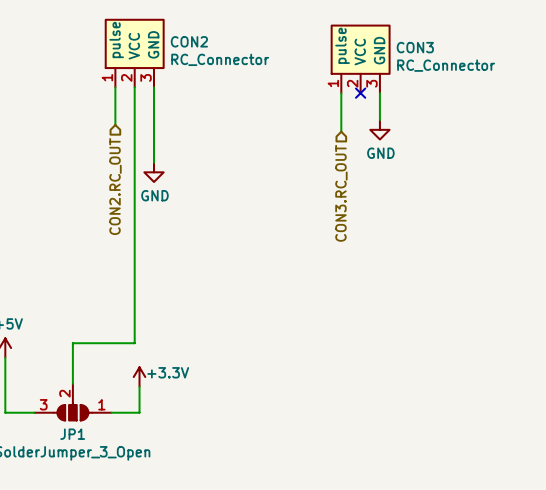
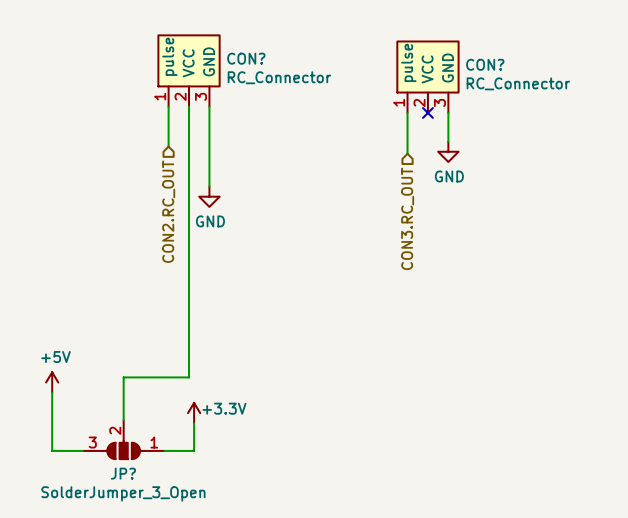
CON2 name: CON2 (189, 41) -> CON? (246, 58)
CON3 name: CON3 (415, 47) -> CON? (485, 64)
JP1 name: JP1 (72, 434) -> JP? (123, 473)

